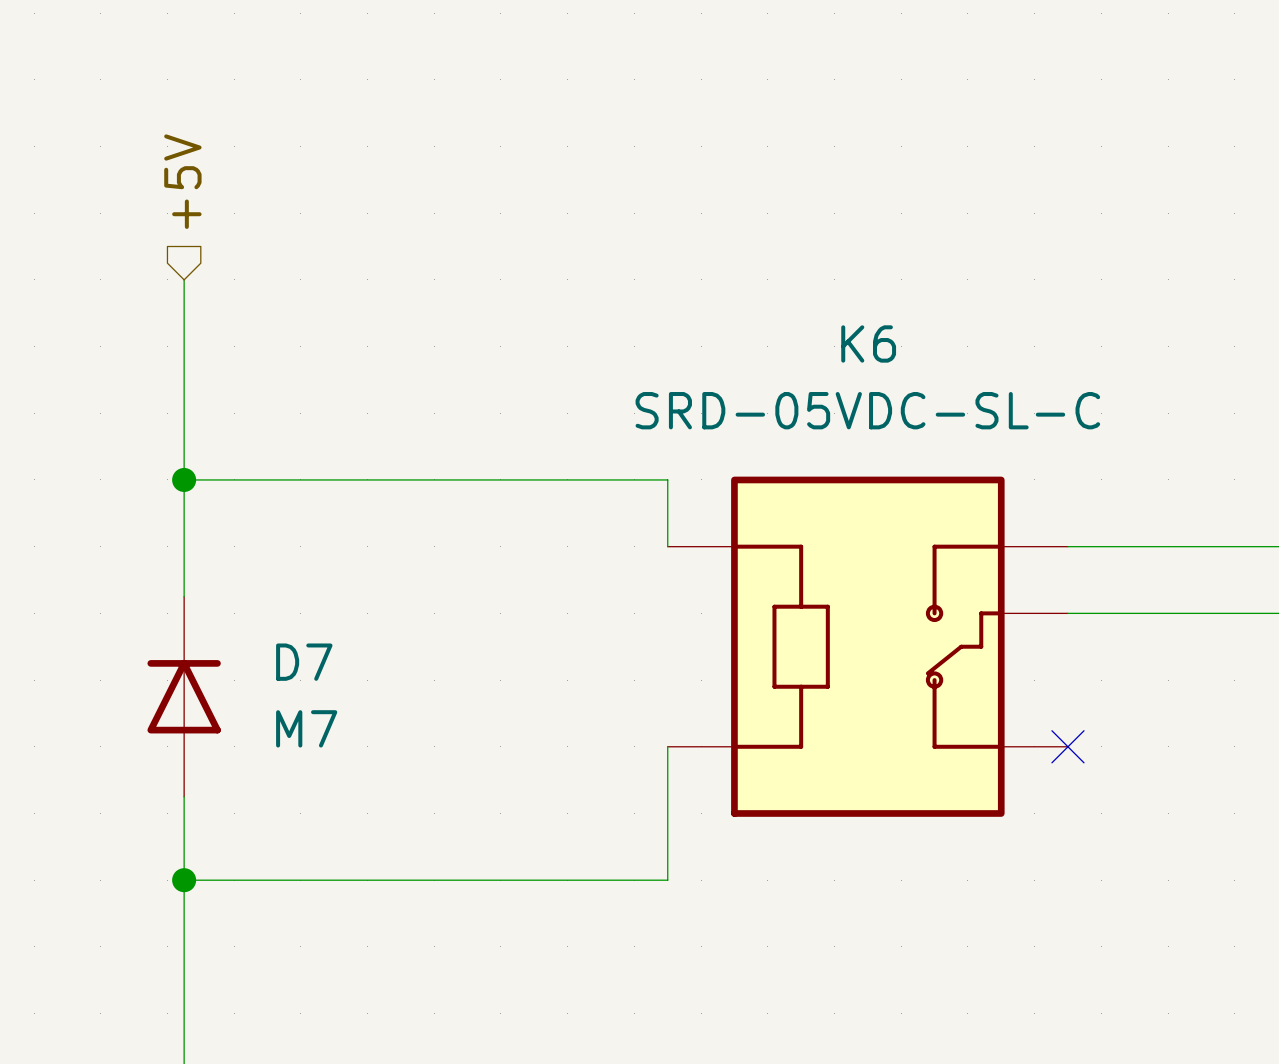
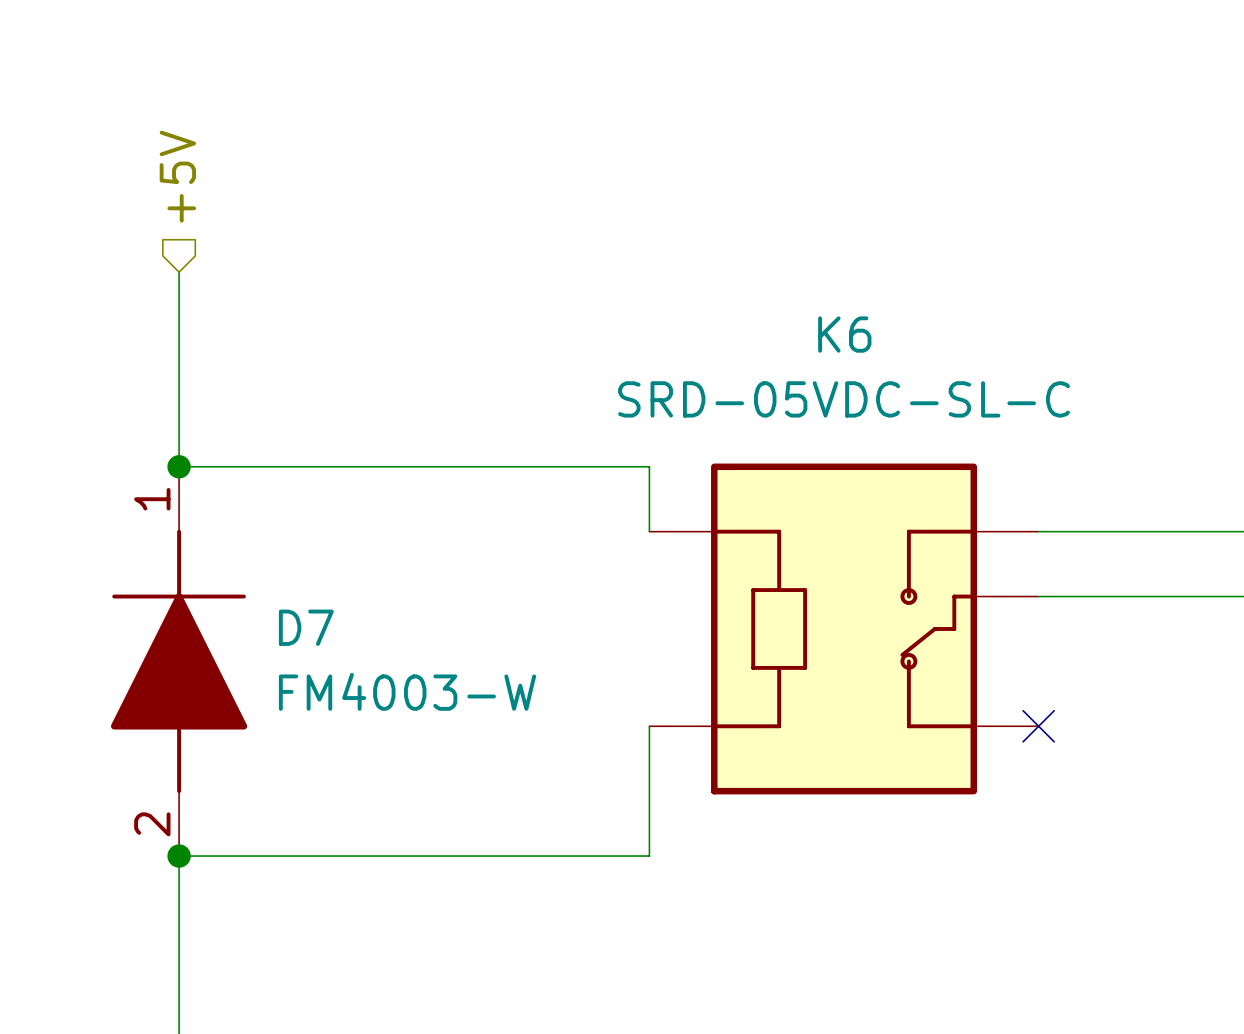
D7 symbol: [147, 596, 221, 797] -> [110, 466, 248, 857]
D7 value: M7 (306, 728) -> FM4003-W (407, 691)

